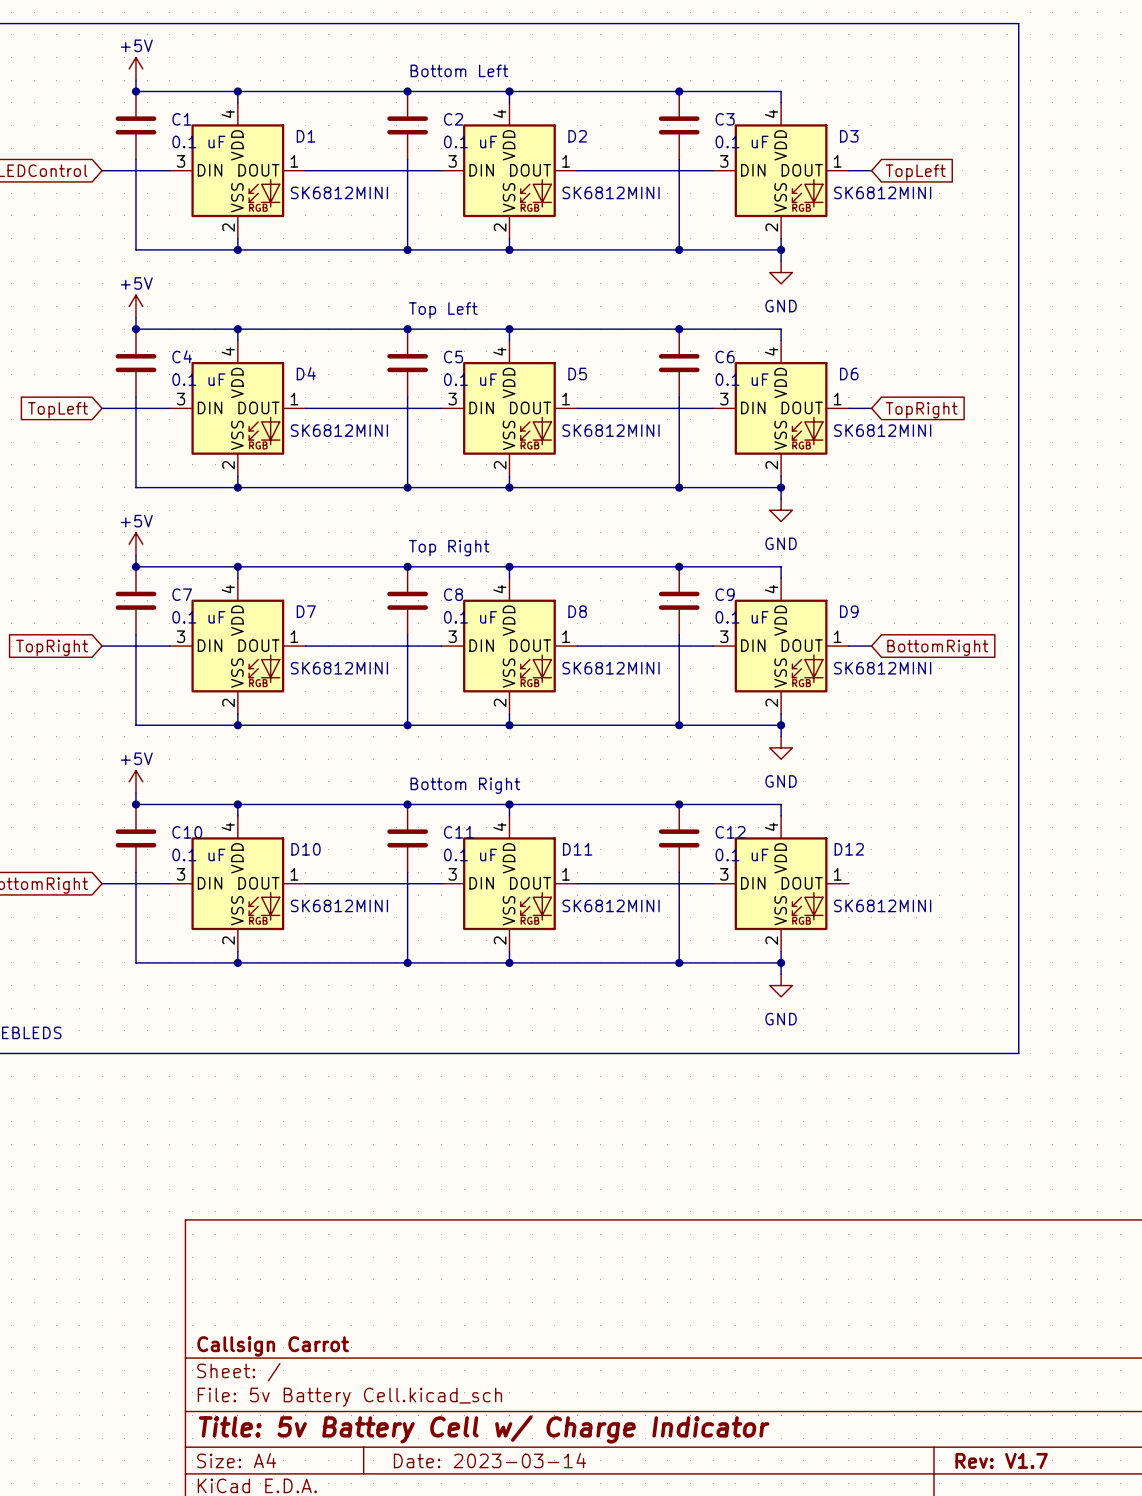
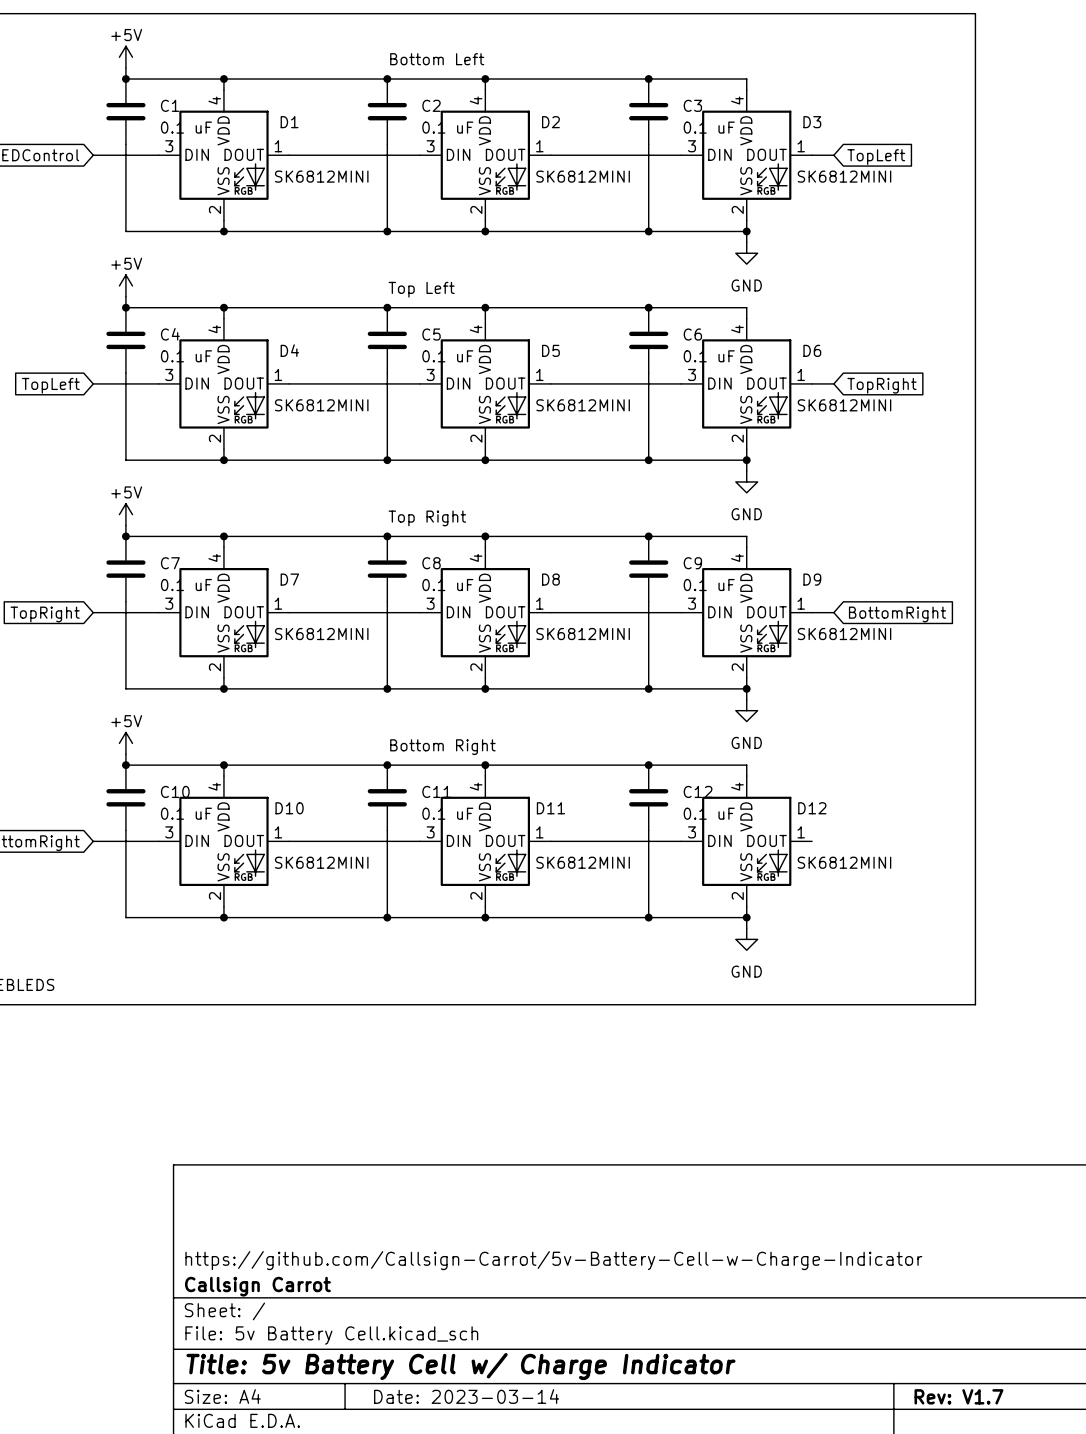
title block: none -> https://github.com/Callsign-Carrot/5v-Battery-Cell-w-Charge-Indicator (553, 1260)

